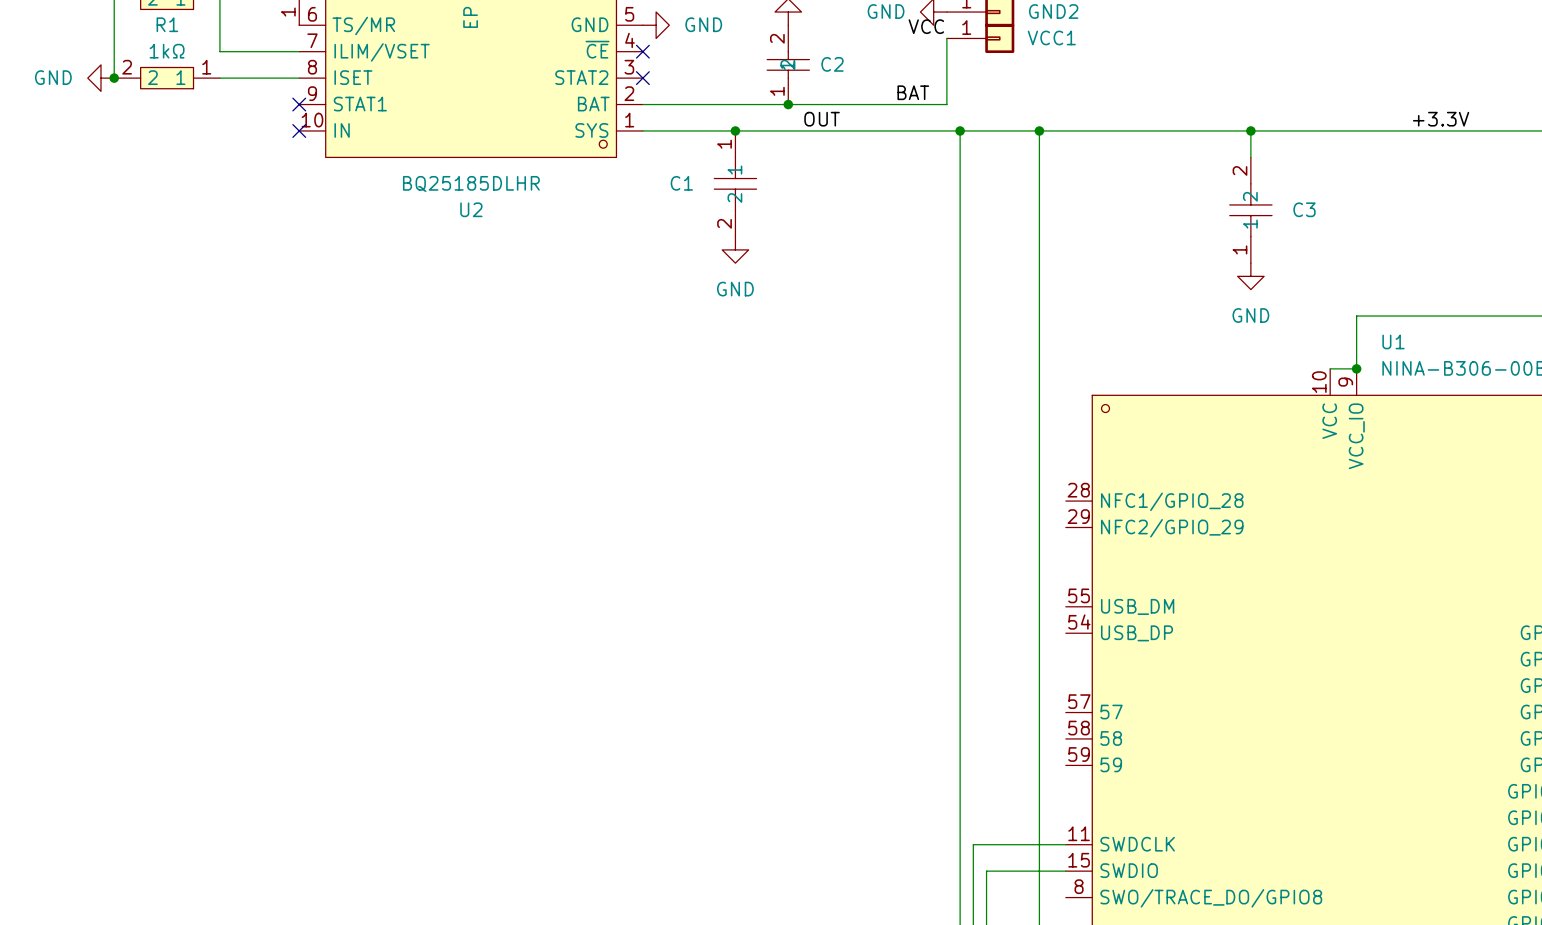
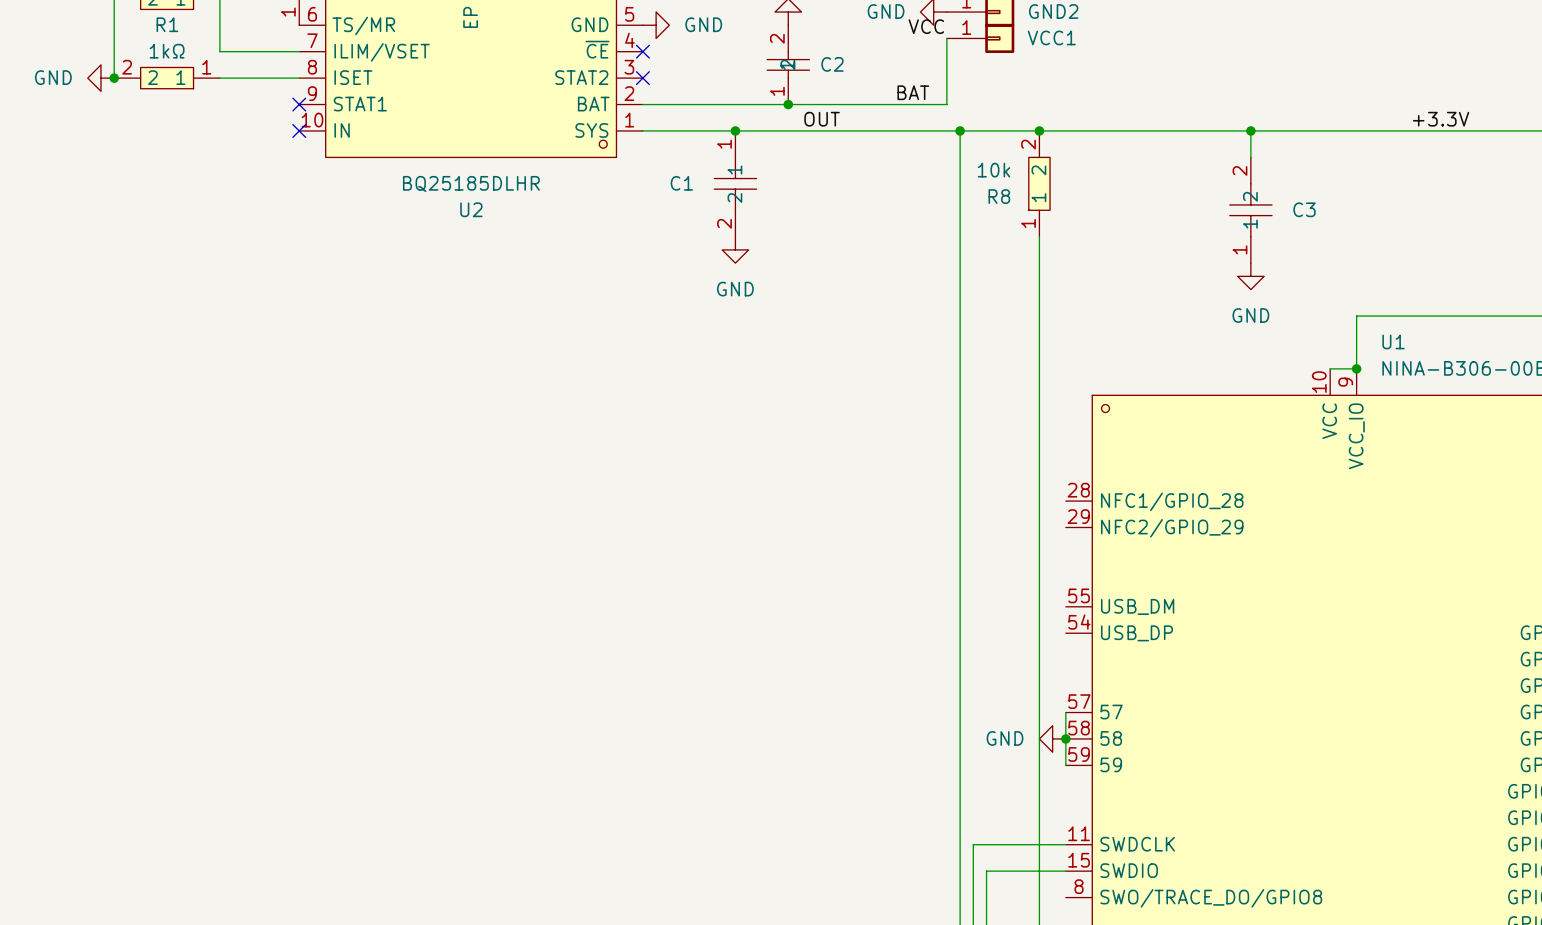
R8: none -> 10k (1039, 183)
wire: none -> (1065, 712) (1065, 765)
power symbol: none -> GND (1052, 738)
junction: none -> (1065, 738)

